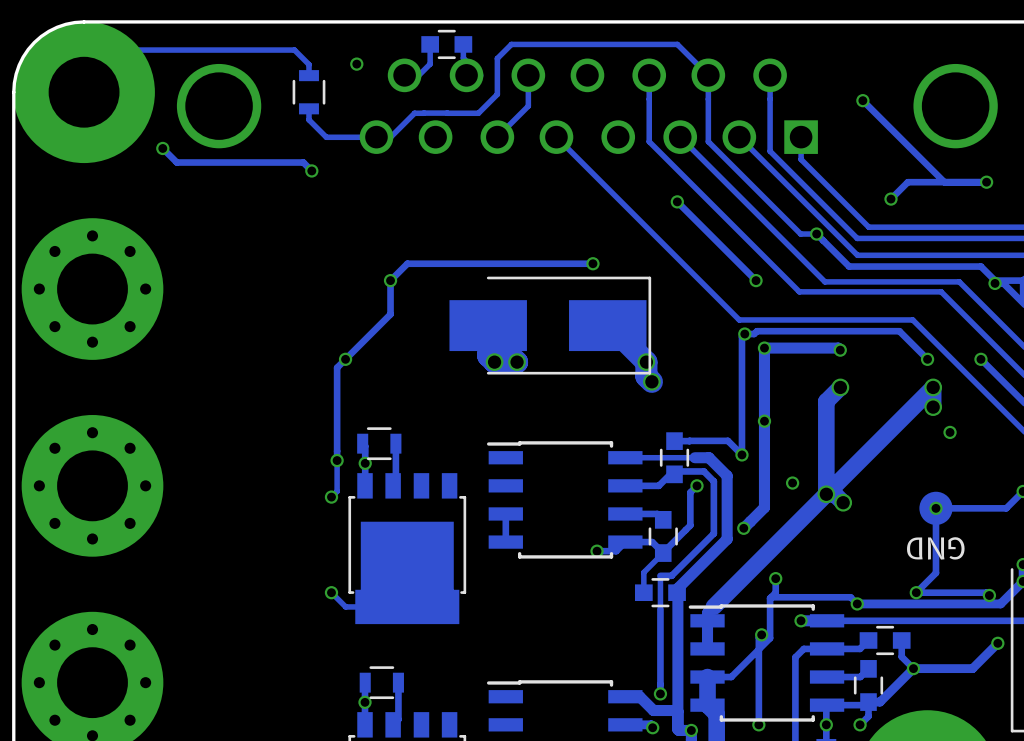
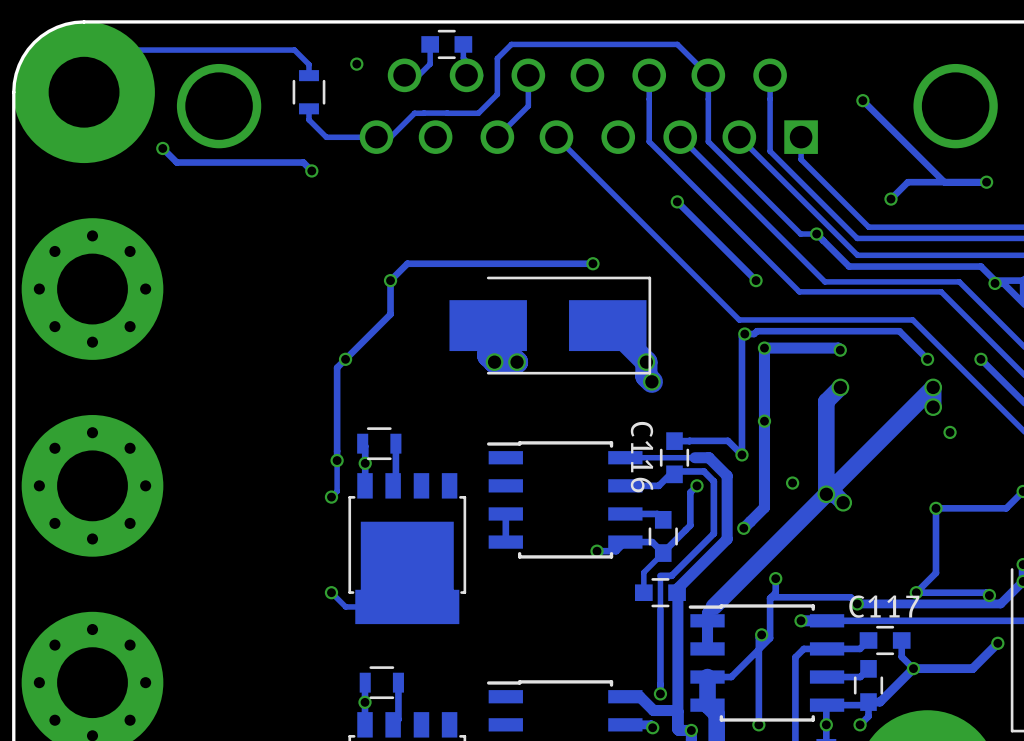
C116 name: none -> C116 (642, 457)
part: (935, 508) -> none
text: GND (935, 548) -> none
C117 name: none -> C117 (884, 606)

